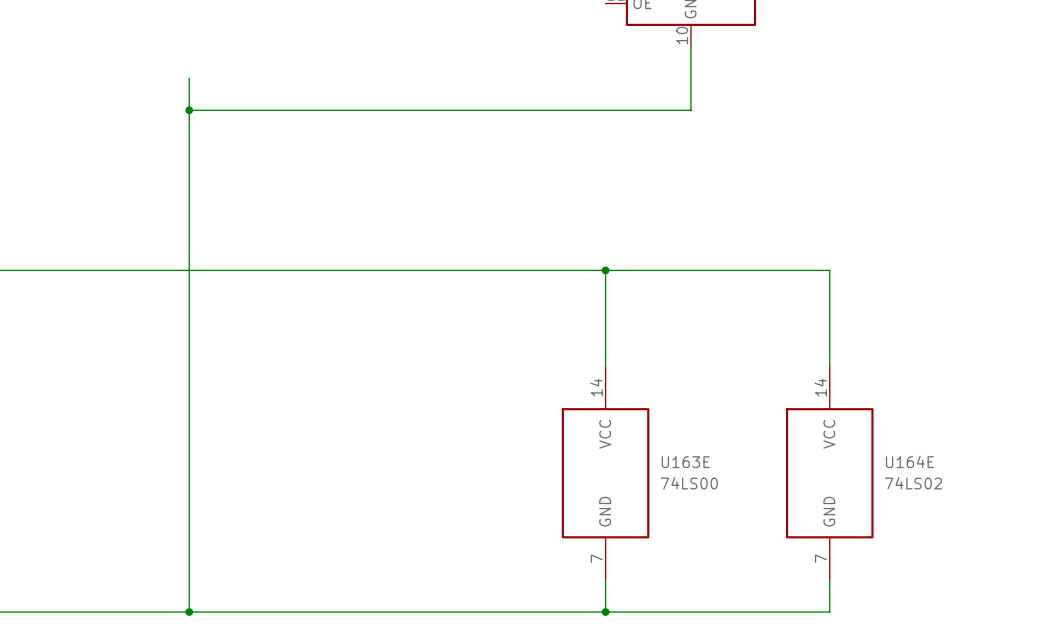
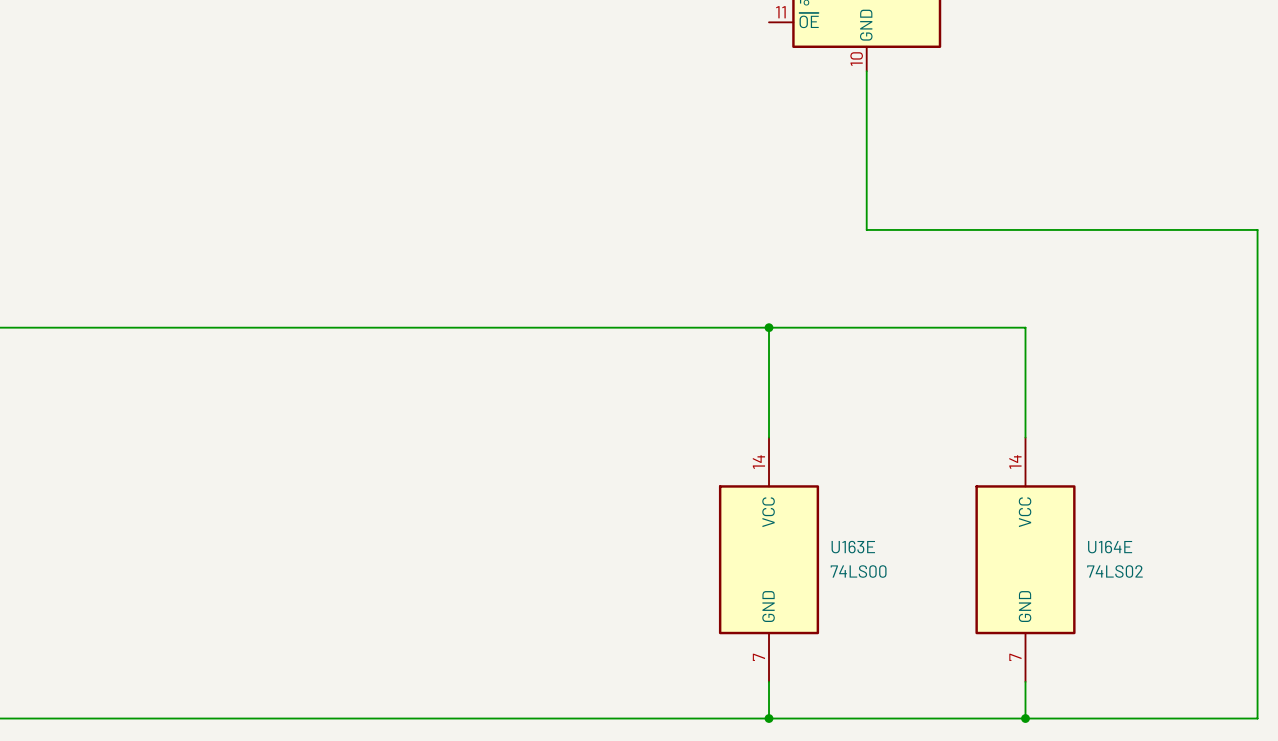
wire: (189, 78) (189, 612) -> none
wire: (189, 110) (690, 110) -> (1025, 718) (1257, 718) (1257, 229) (866, 229) (866, 144)
junction: (189, 110) -> none
junction: (189, 612) -> none
junction: none -> (1025, 718)

